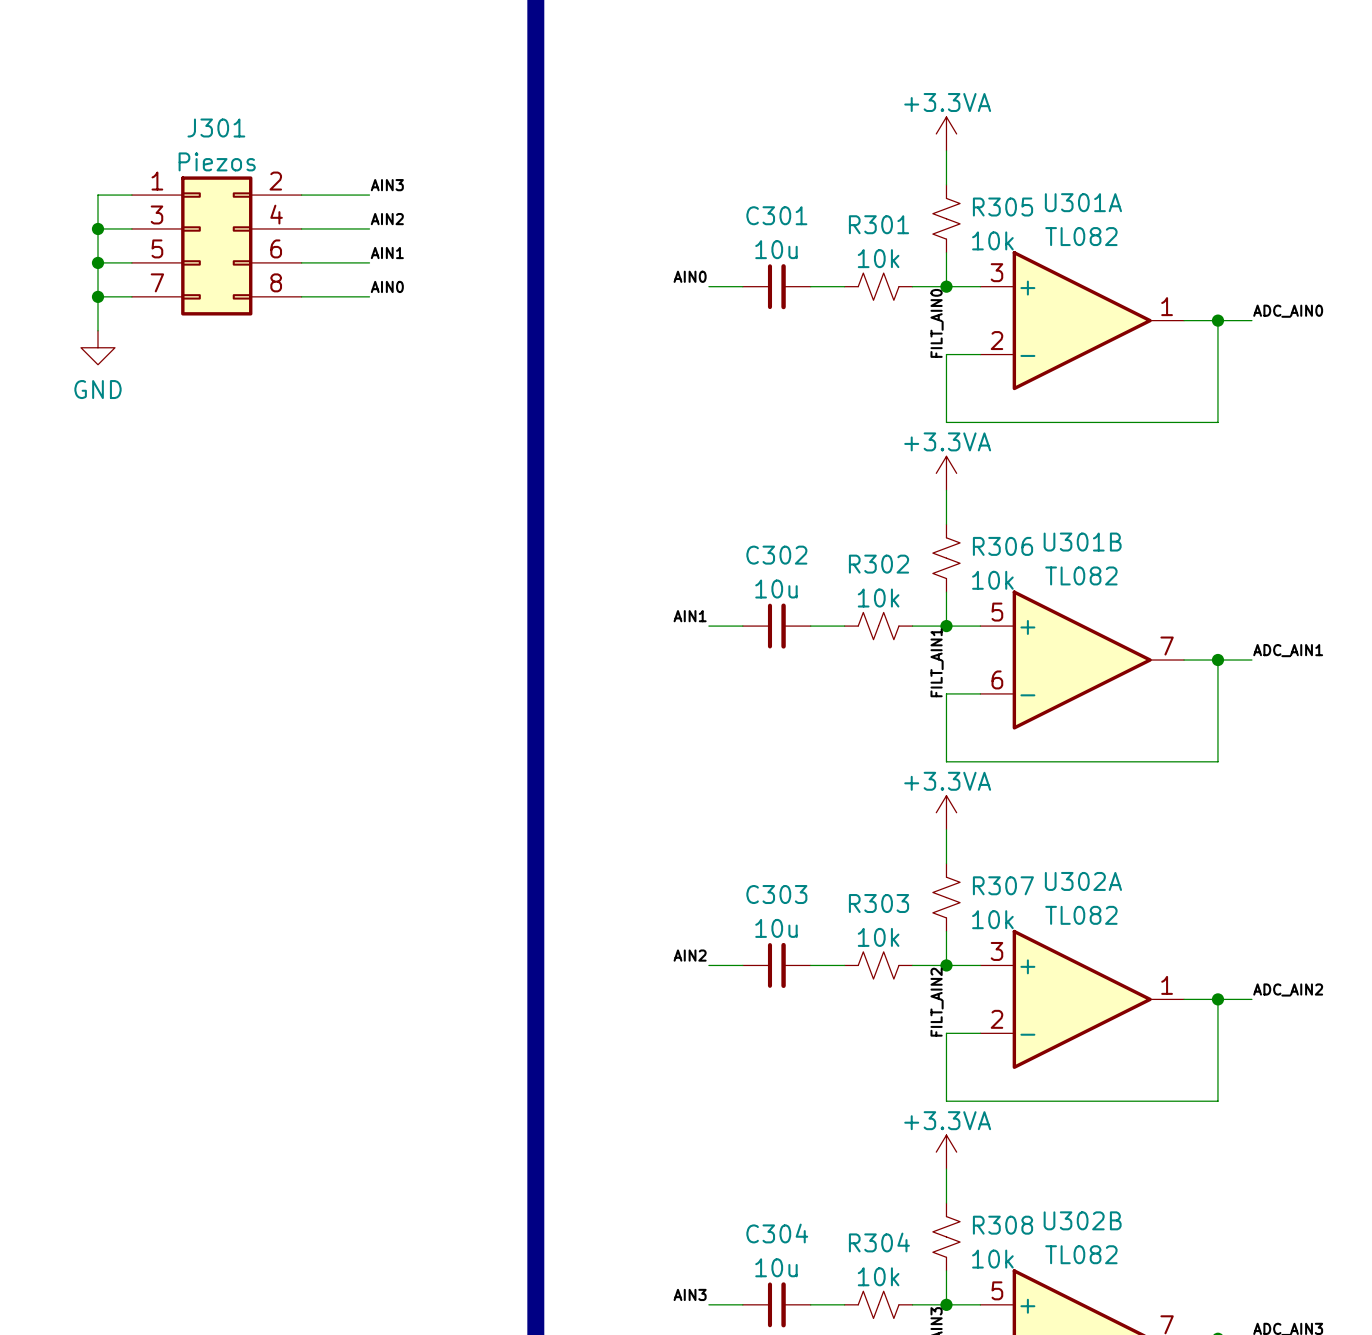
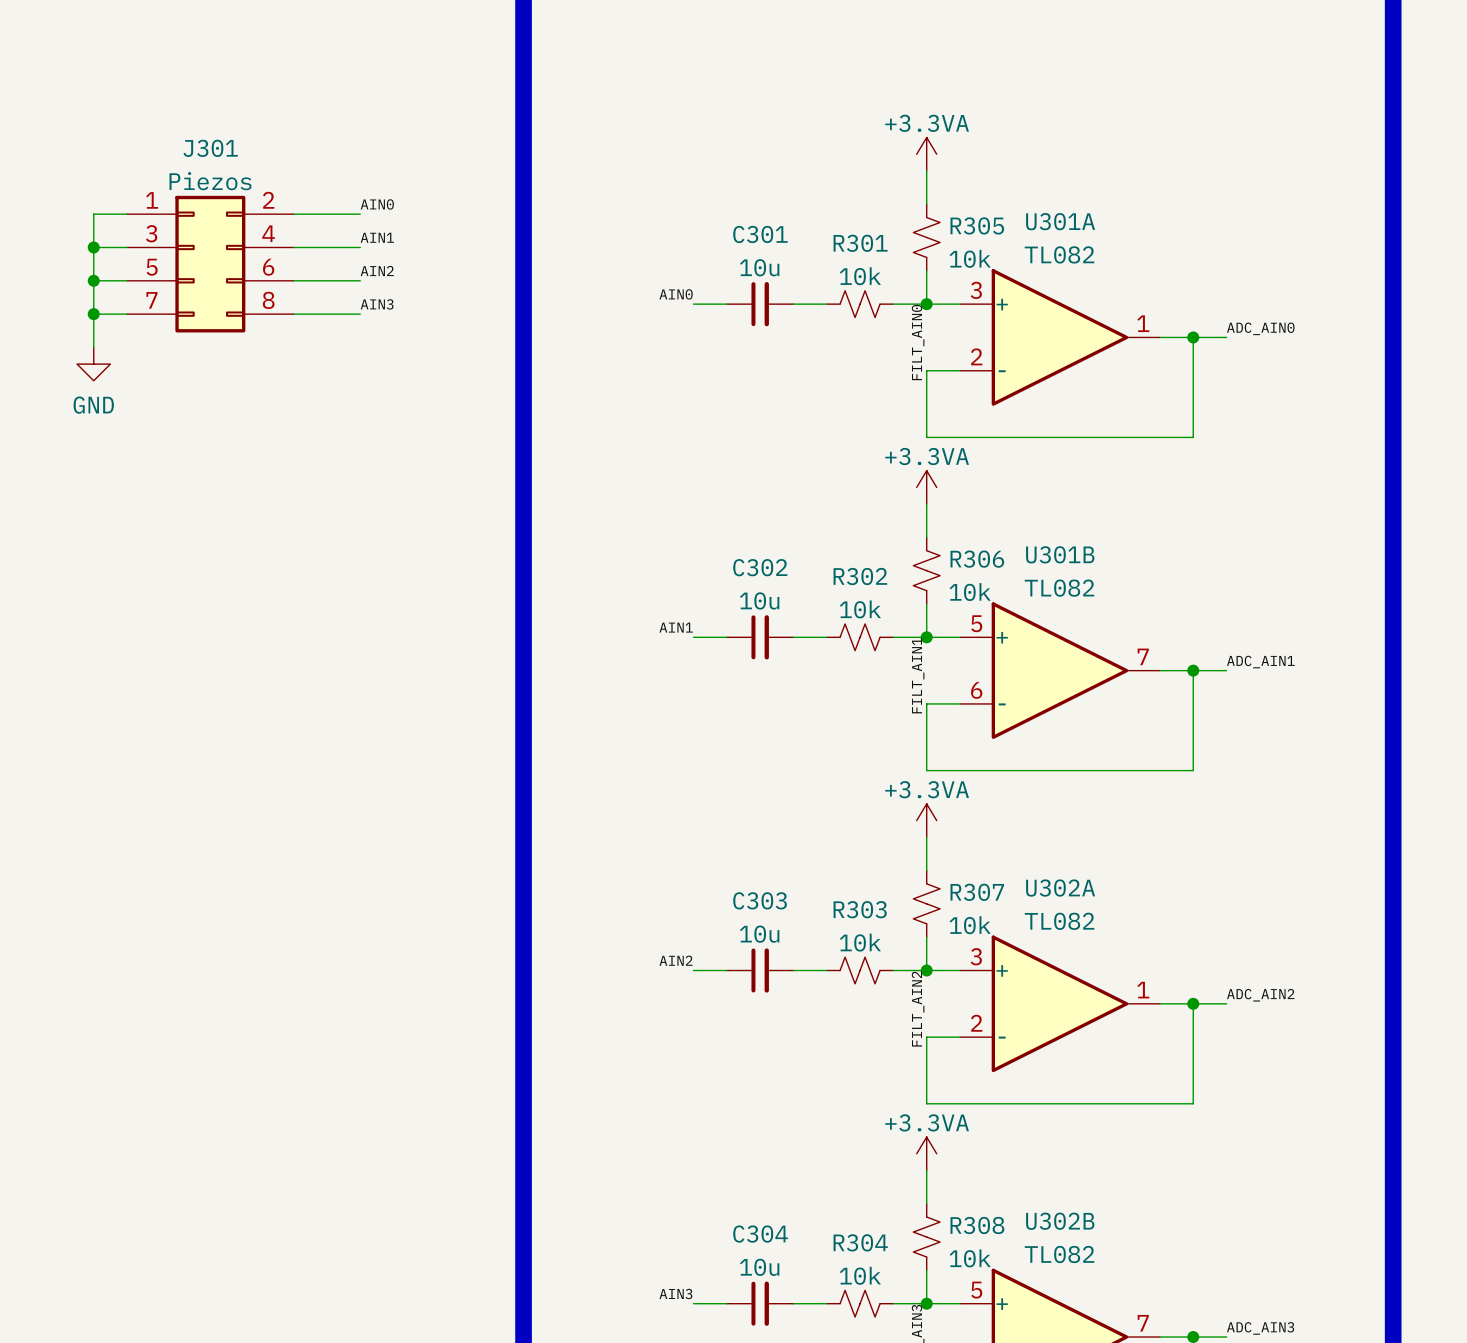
label: AIN3 (387, 185) -> AIN0 (377, 204)
label: AIN2 (387, 219) -> AIN1 (377, 237)
label: AIN1 (387, 253) -> AIN2 (377, 271)
label: AIN0 (387, 286) -> AIN3 (377, 304)

